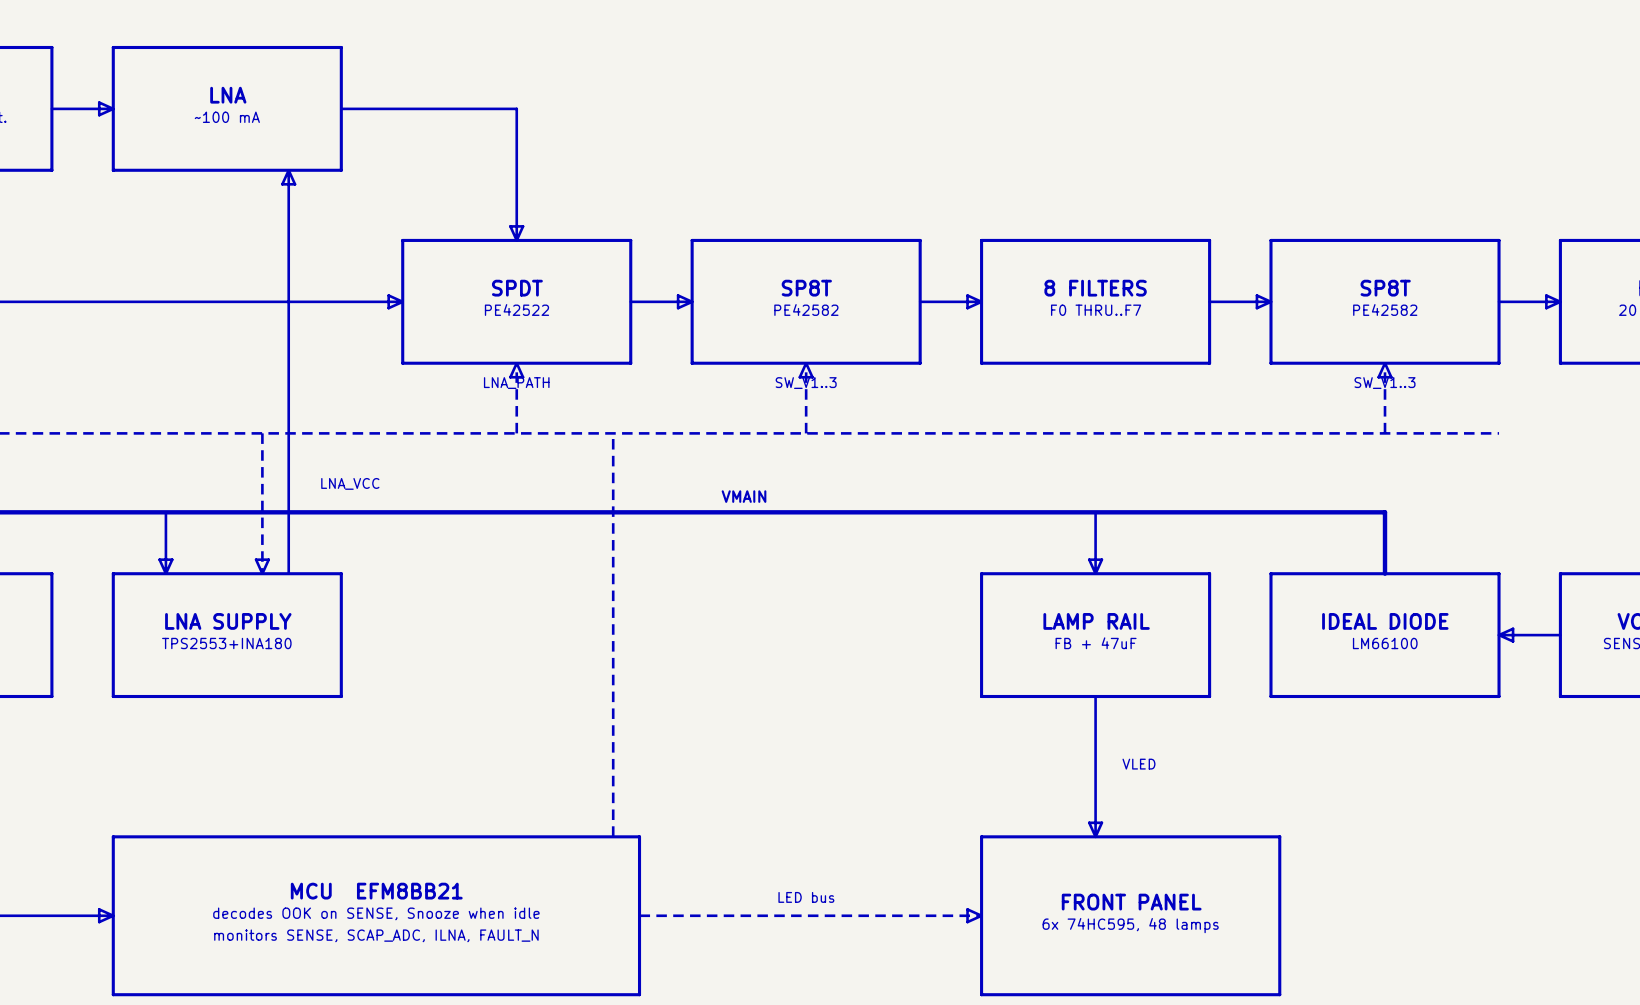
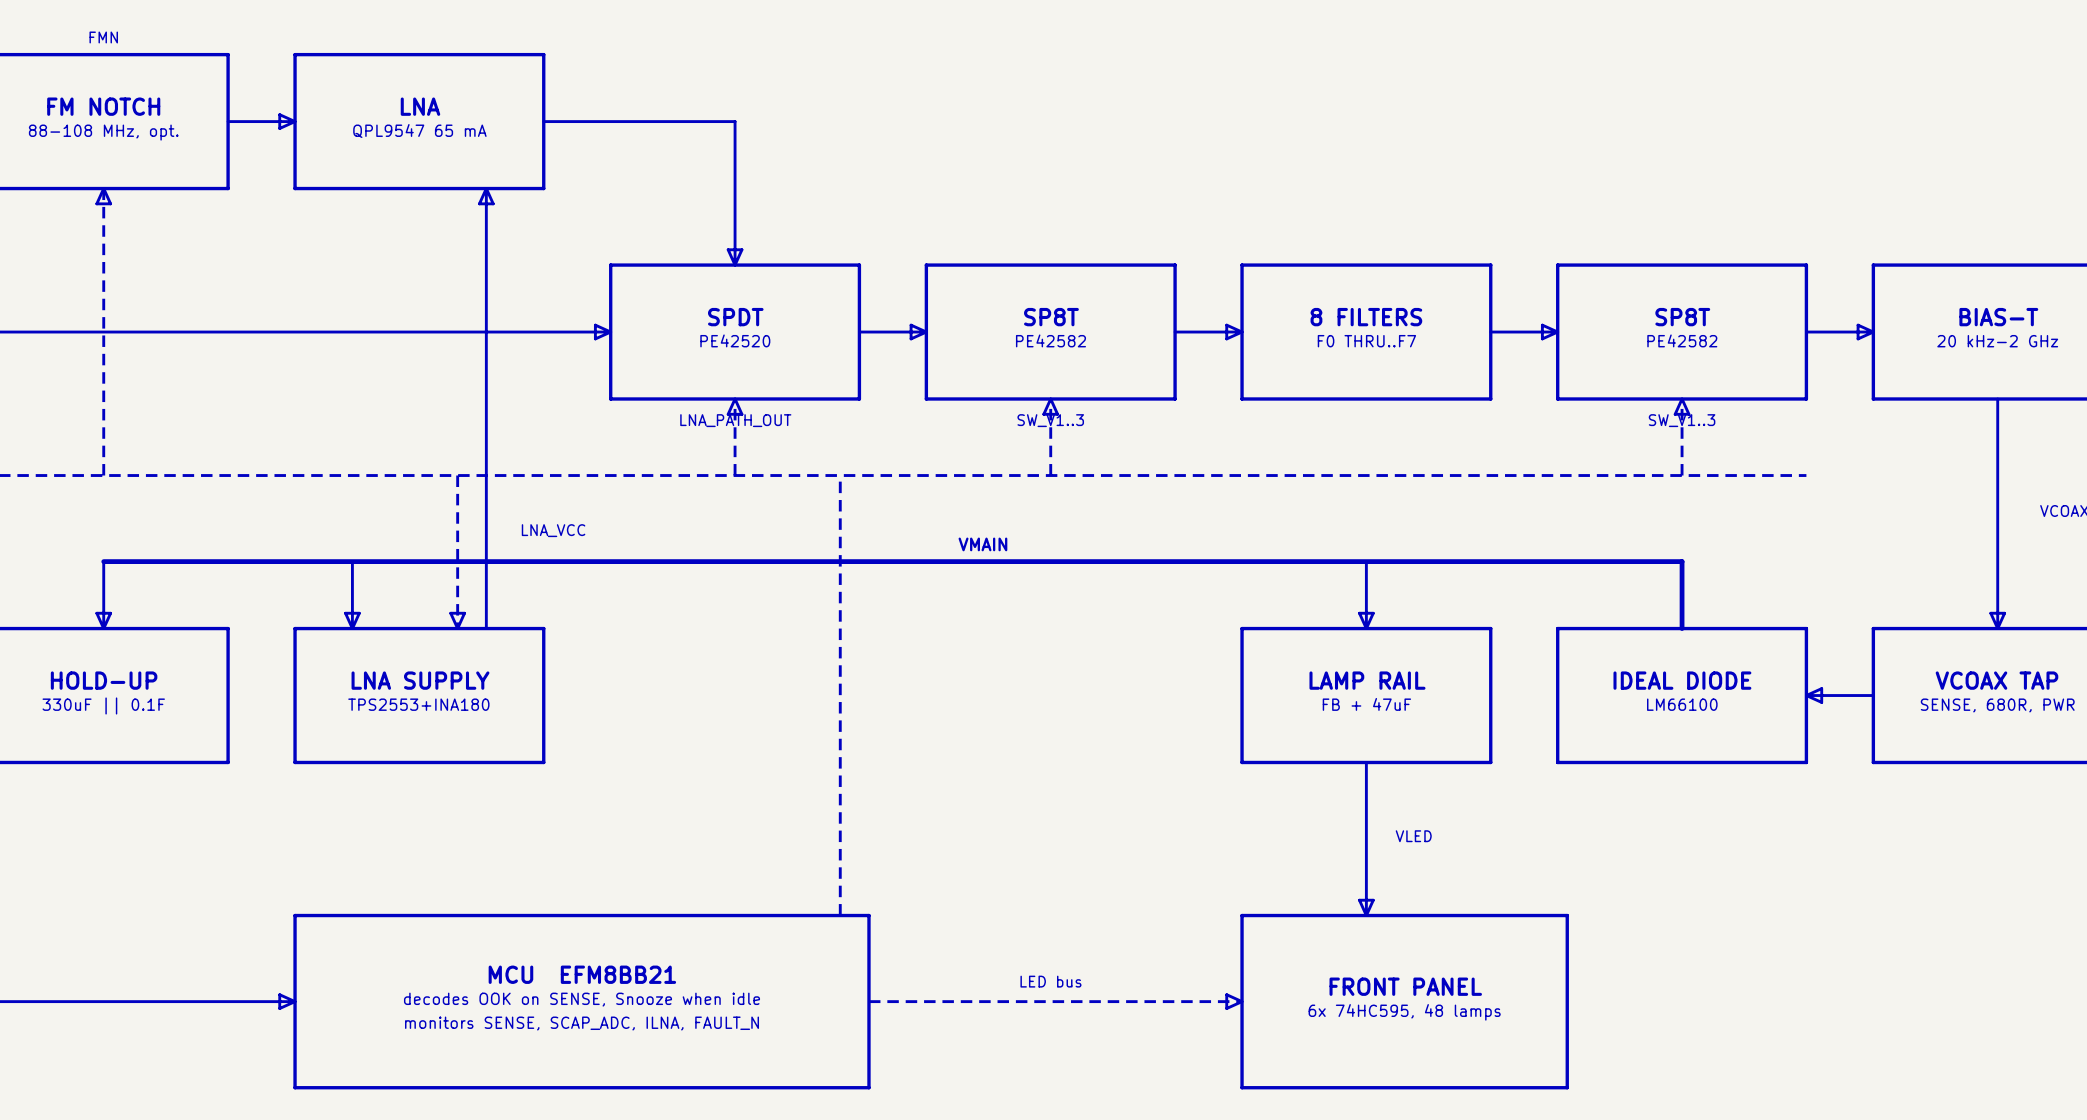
text: ~100 mA (227, 117) -> QPL9547 65 mA (419, 131)
text: PE42522 (516, 309) -> PE42520 (735, 340)
text: LNA_PATH (516, 383) -> LNA_PATH_OUT (735, 420)

